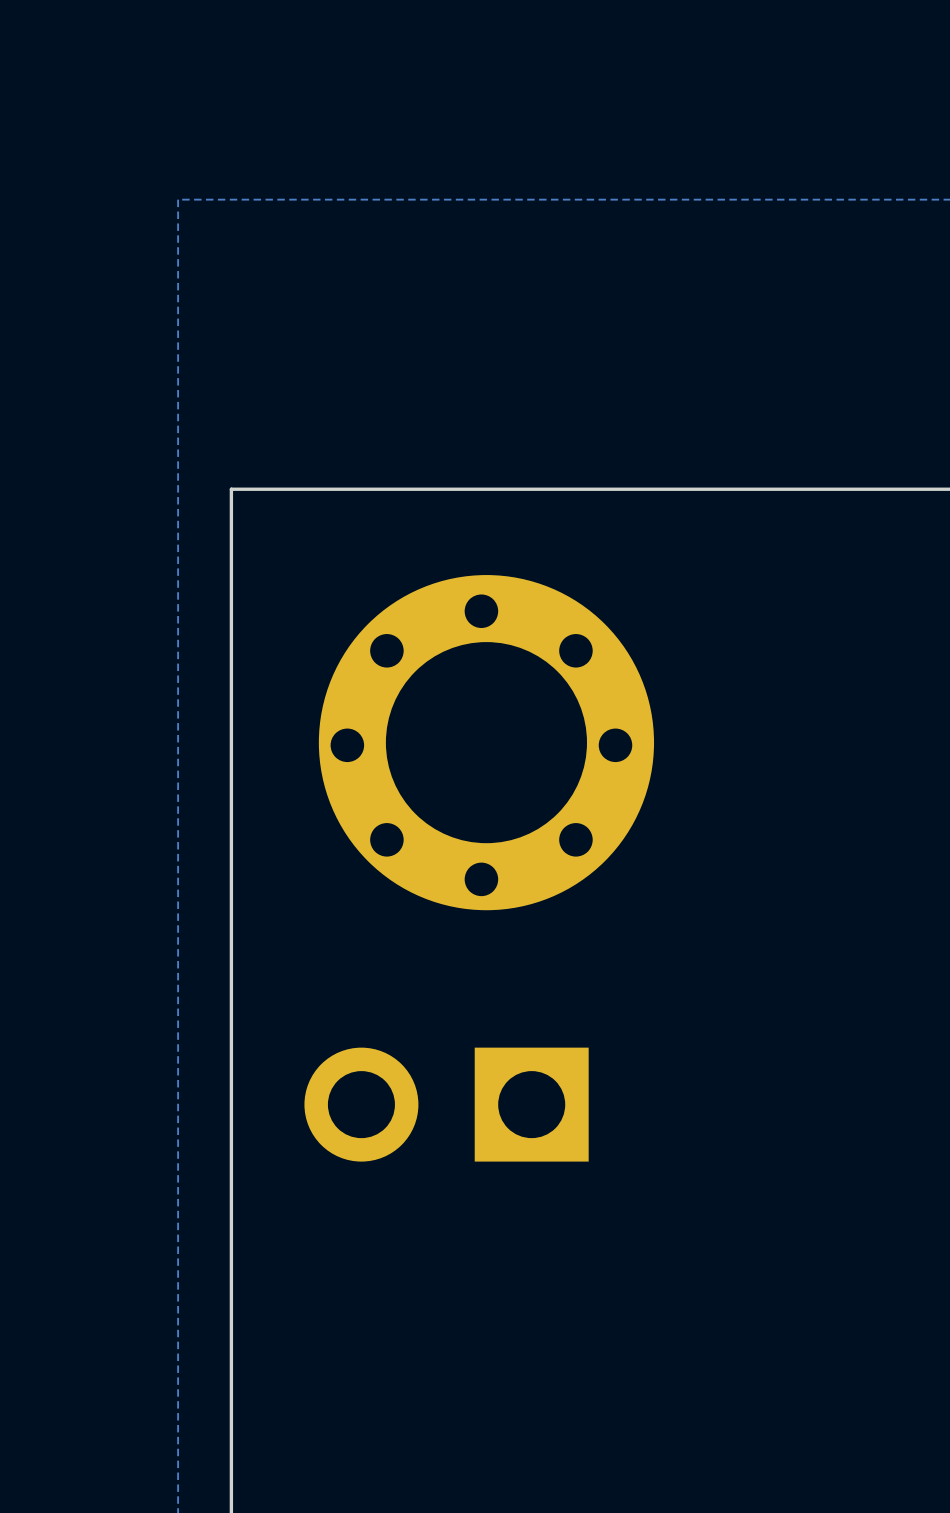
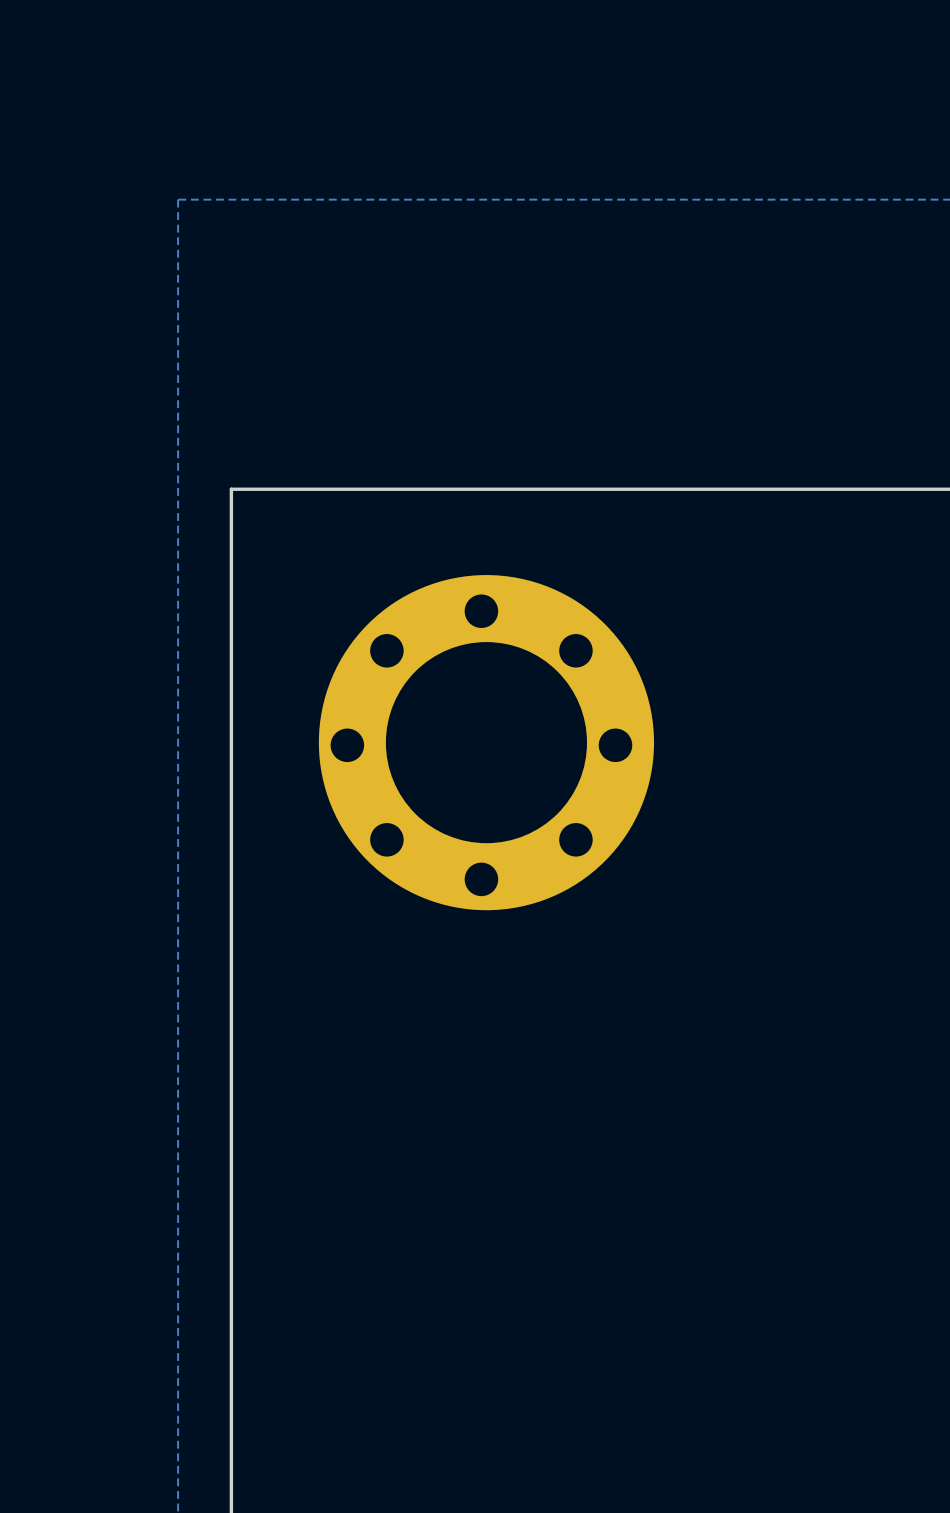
part: (446, 1104) -> none

